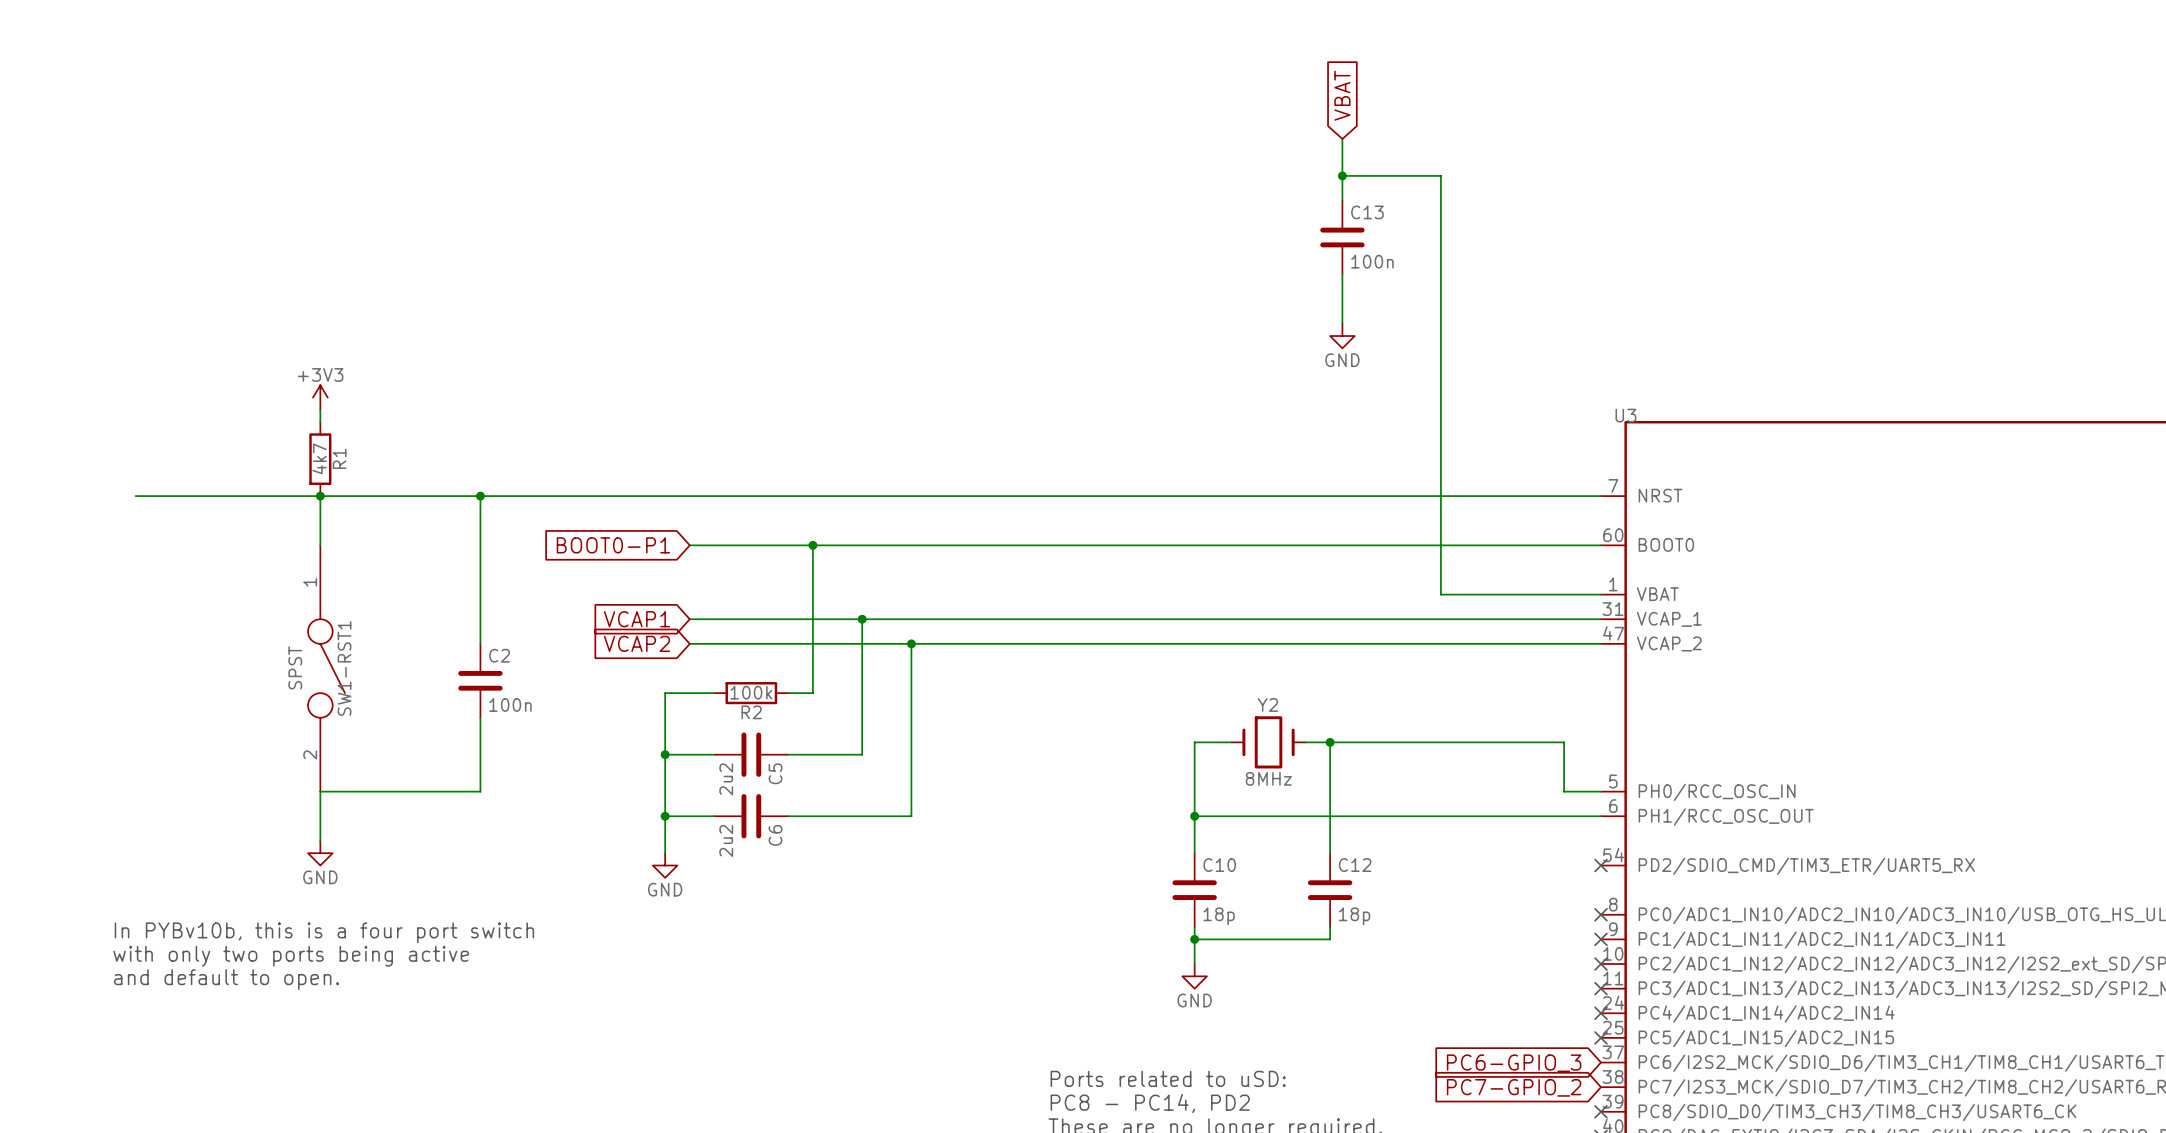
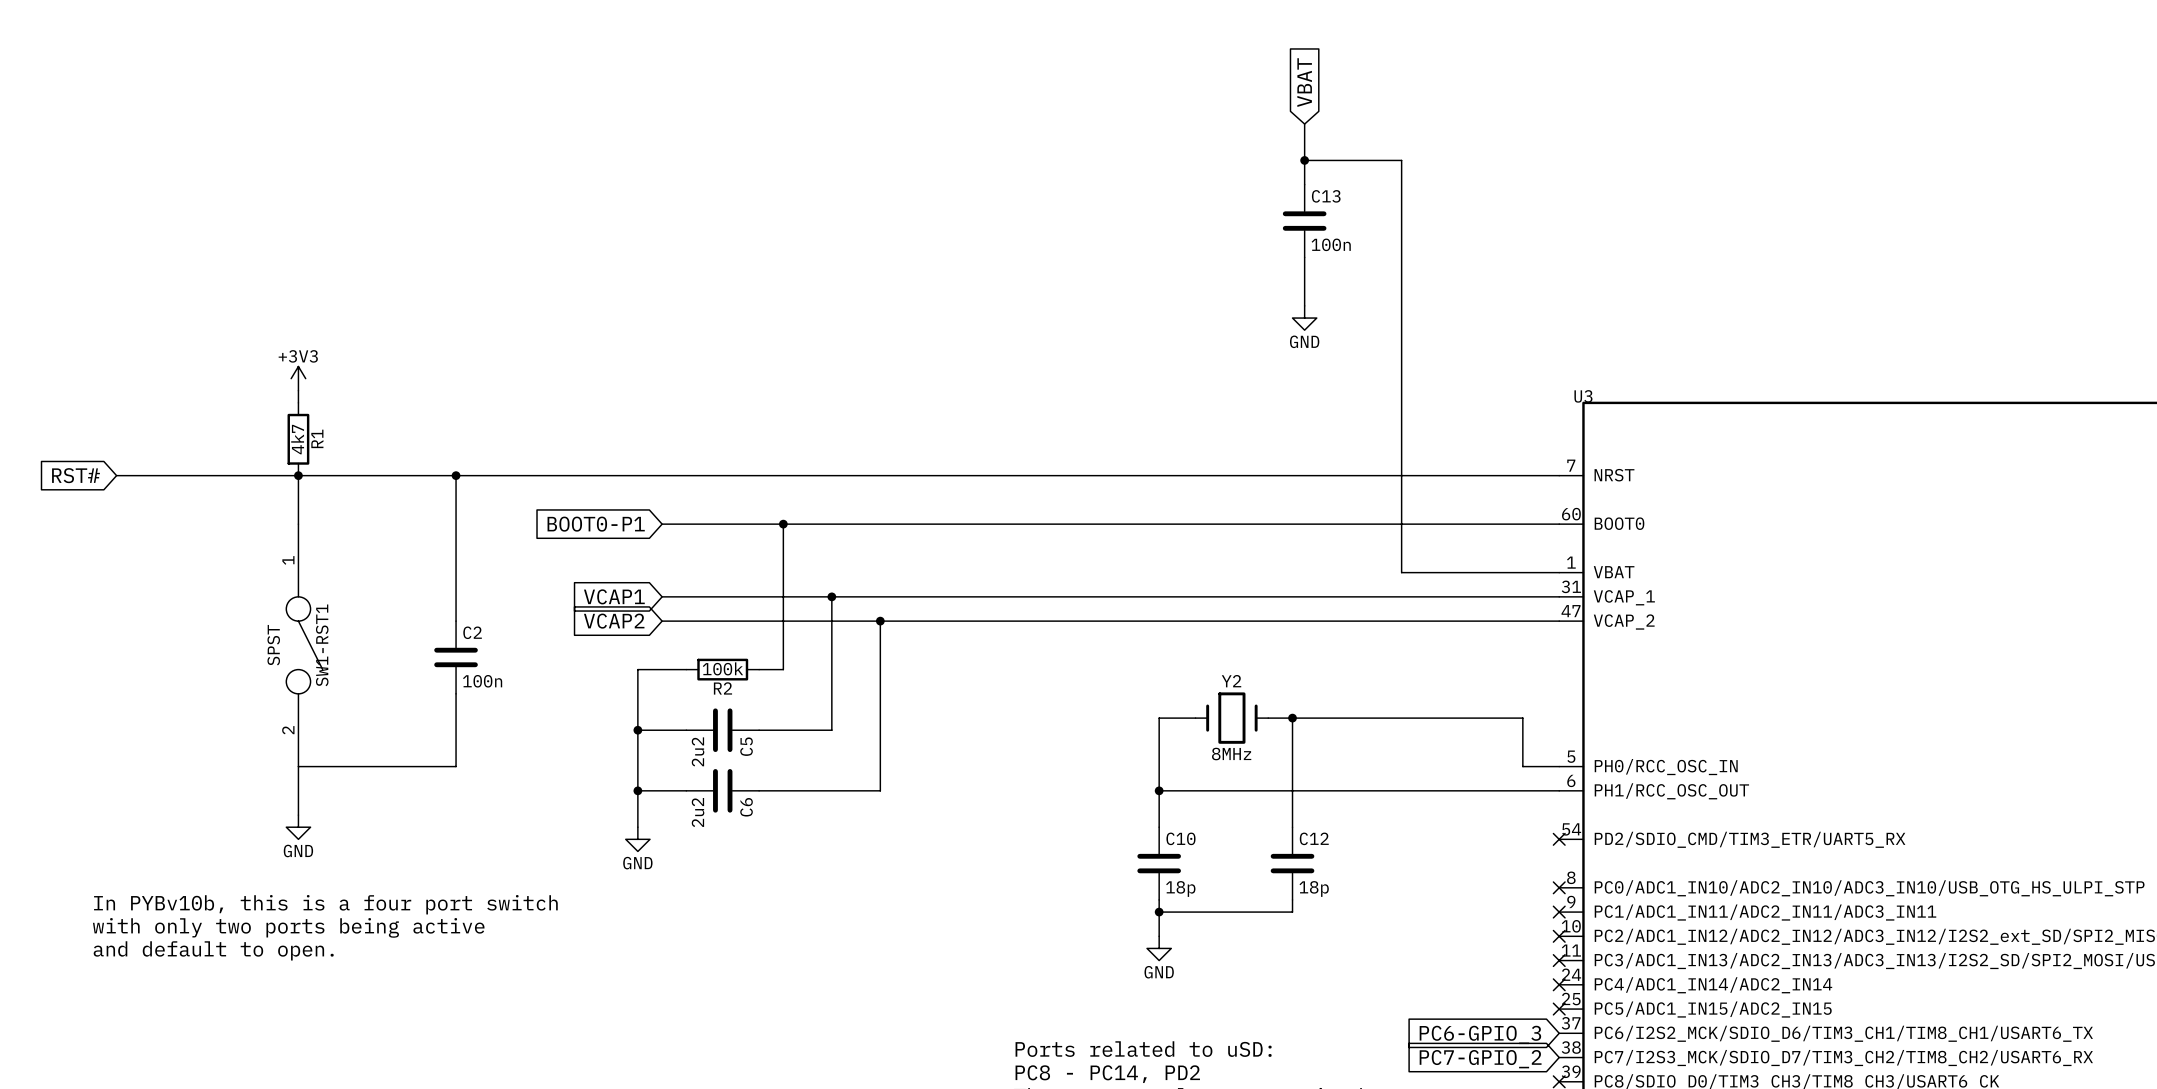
global label: none -> RST# (75, 475)

